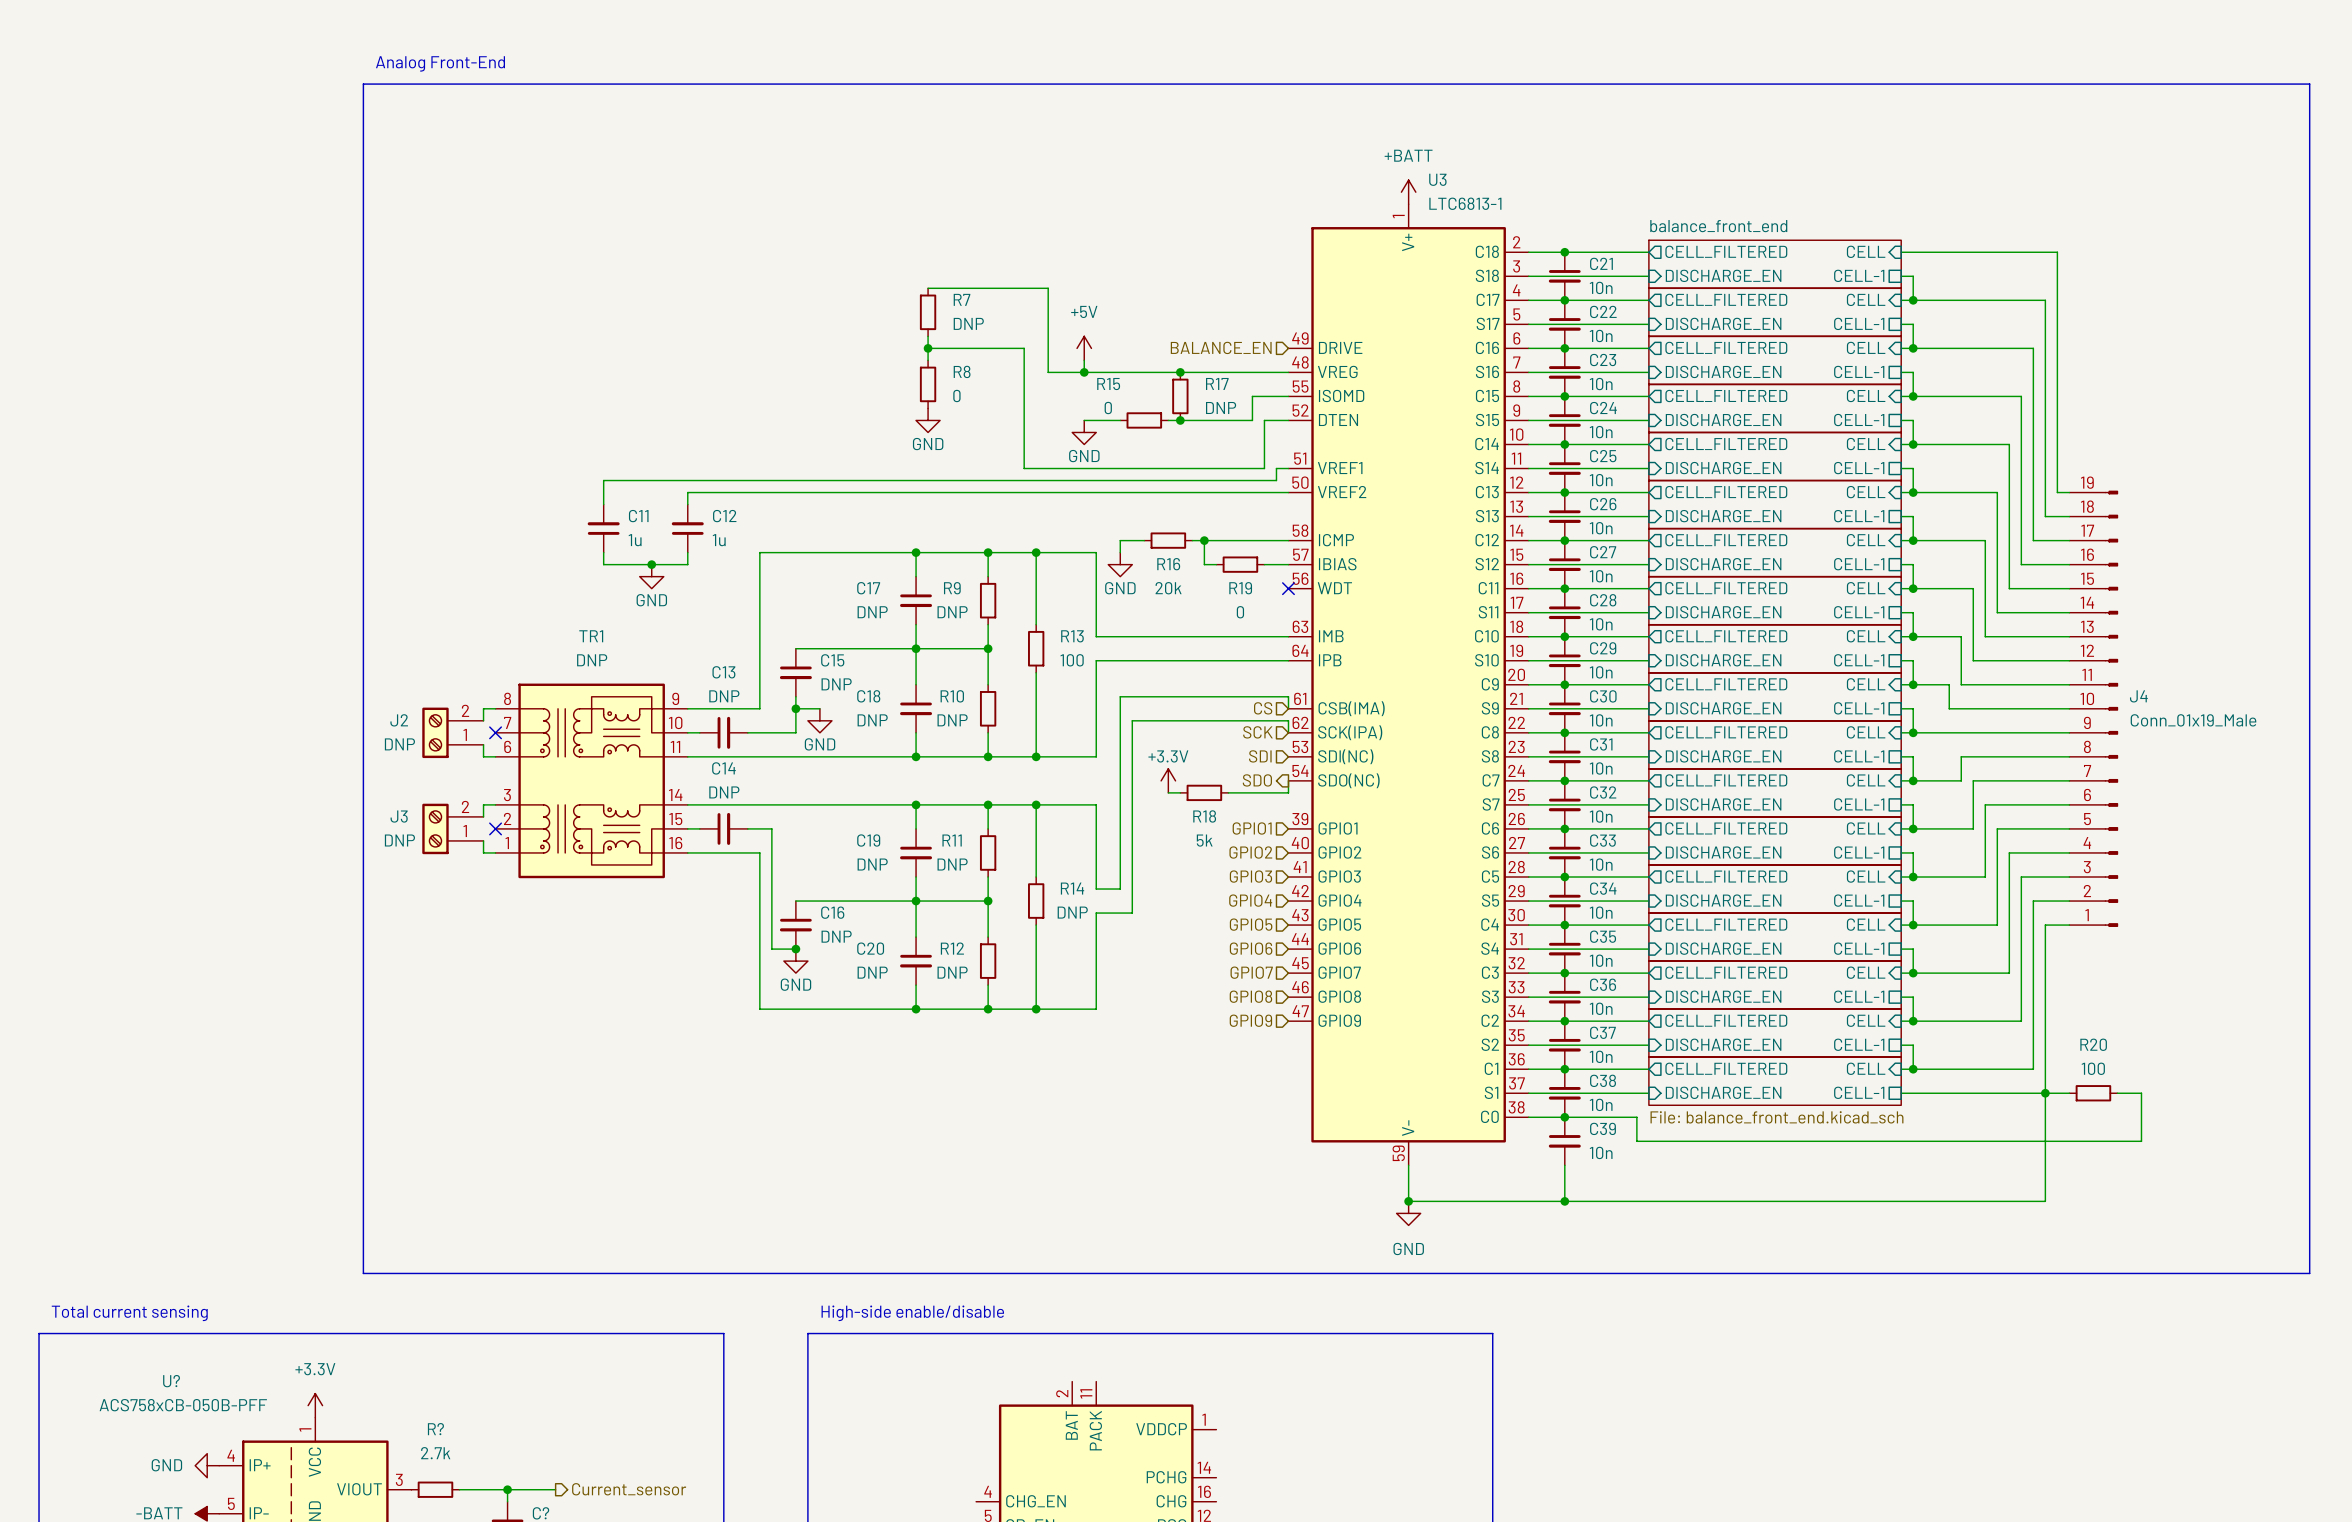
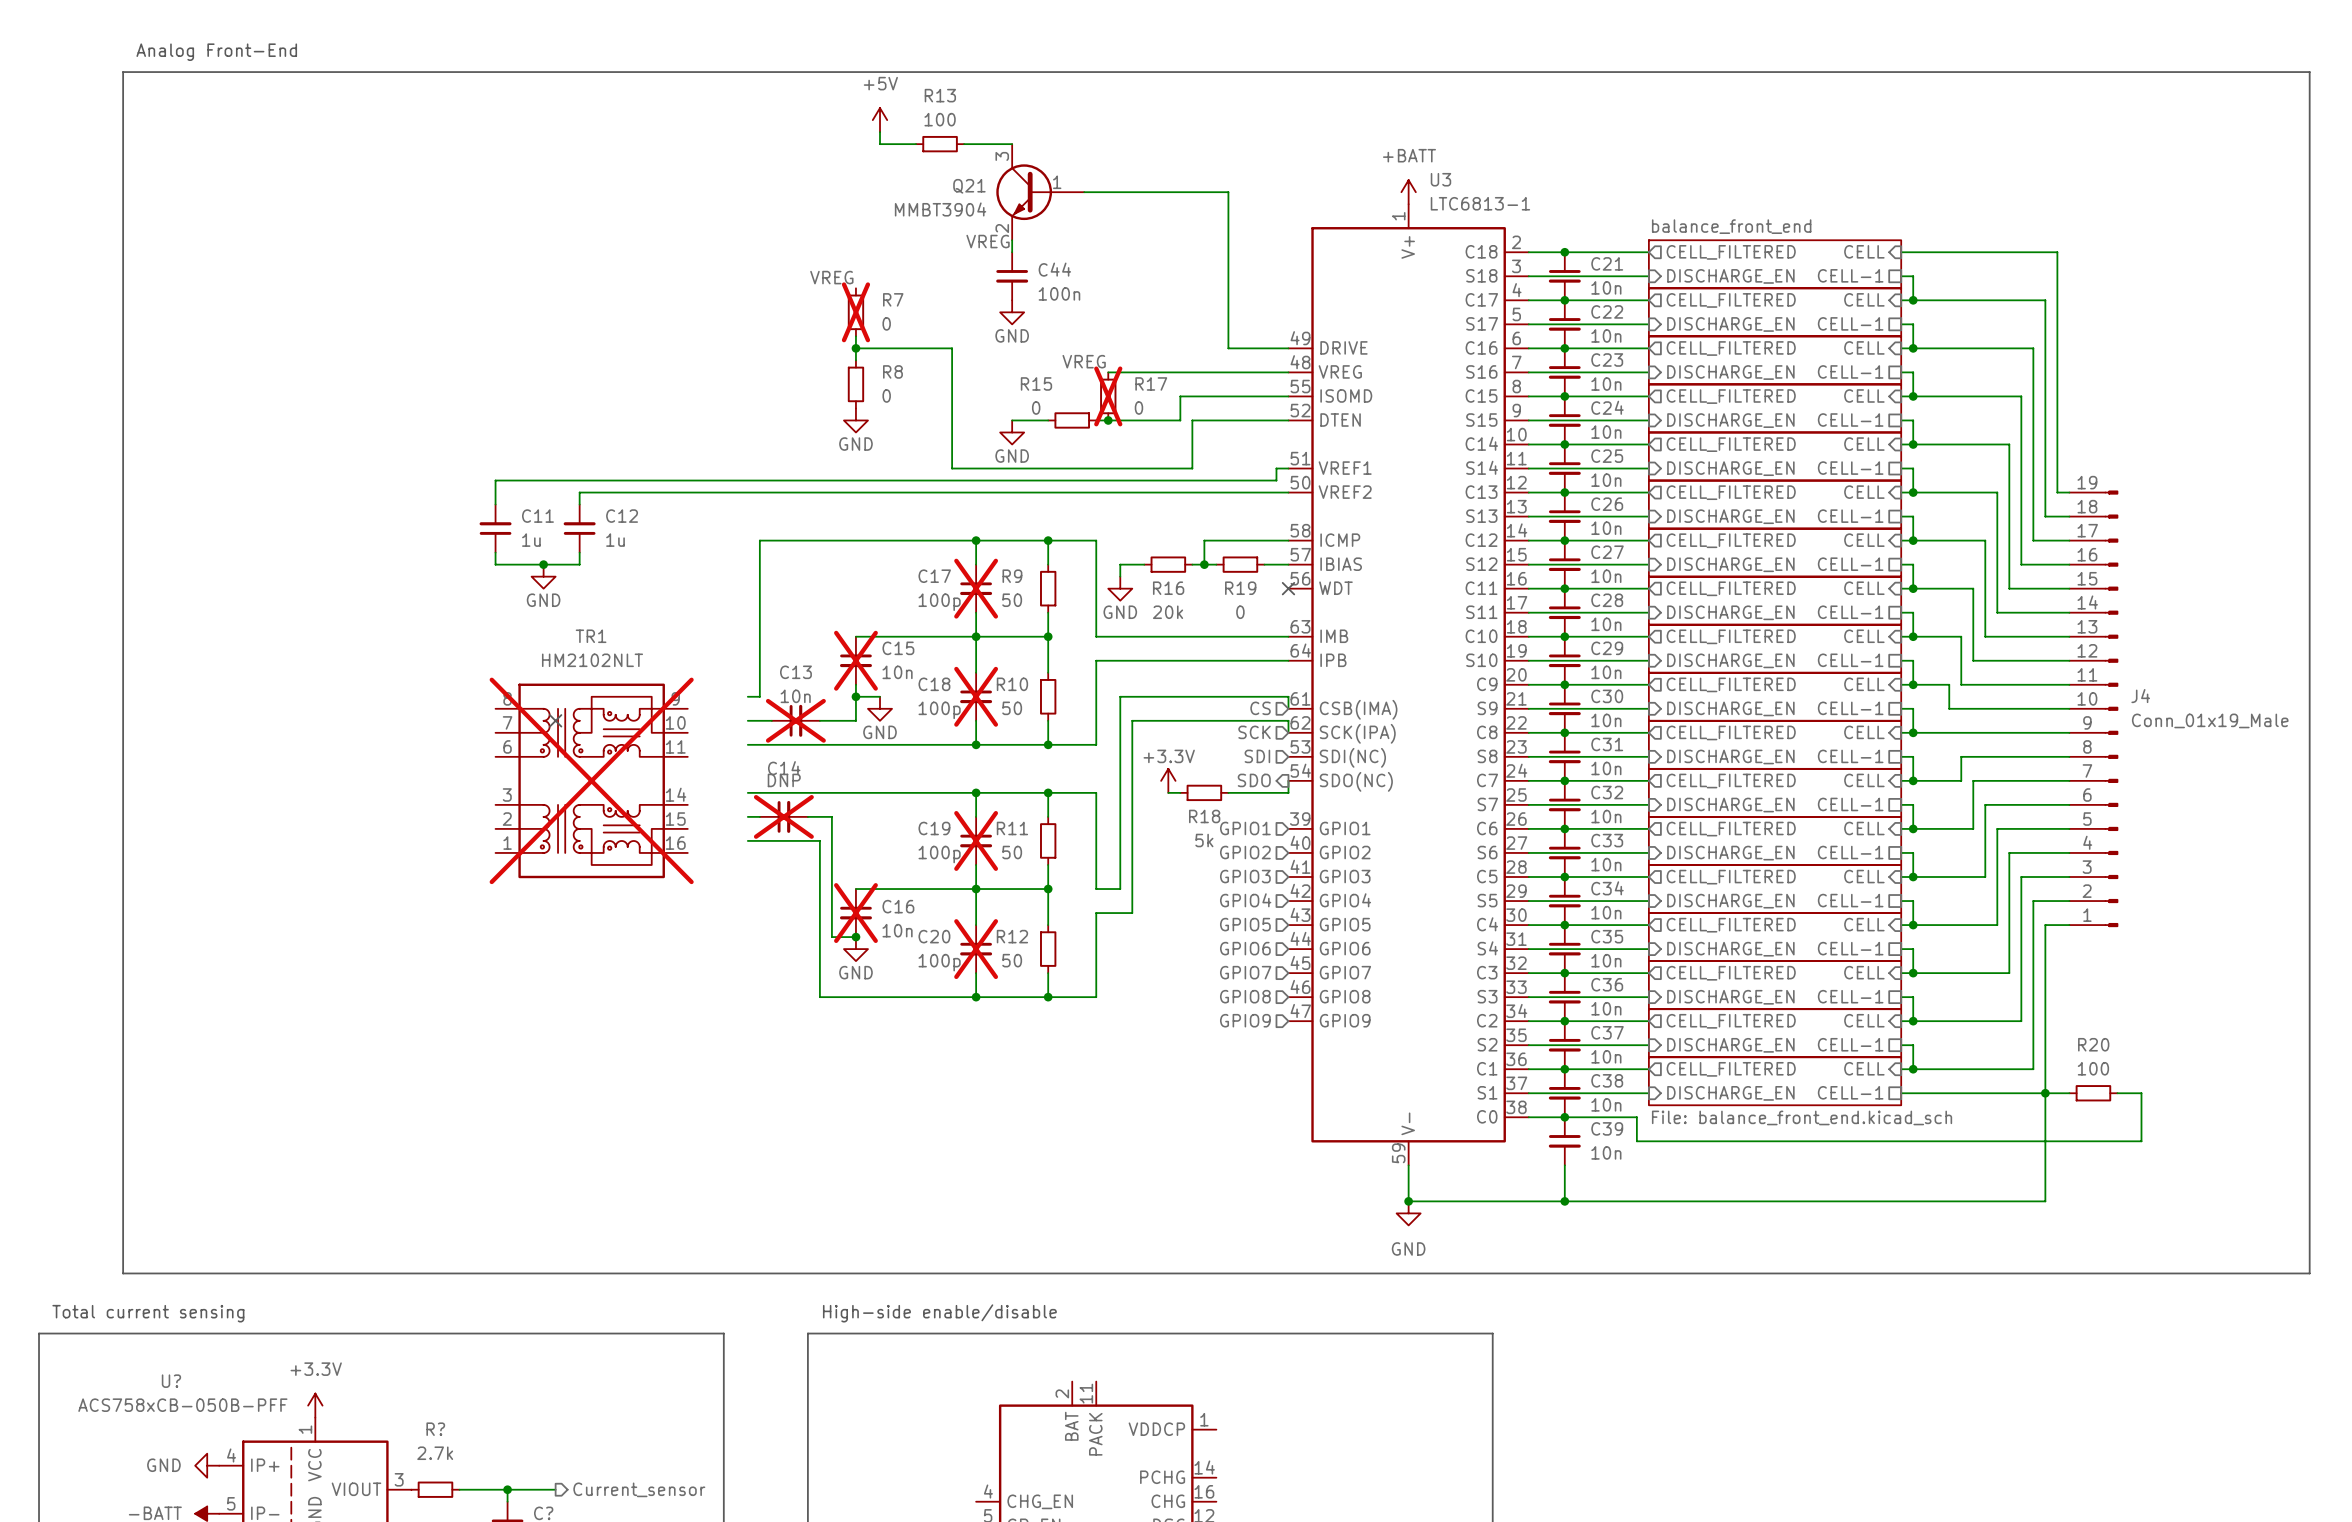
text: none -> Analog Front-End (216, 52)
text: Analog Front-End (440, 63) -> none
line: (2309, 84) (363, 84) (363, 1273) -> (2309, 84) (2309, 72) (123, 72) (123, 1273) (363, 1273)
power symbol: none -> +5V (880, 120)
wire: none -> (880, 132) (880, 144) (916, 144)
wire: none -> (964, 144) (1012, 144)
Q21: none -> MMBT3904 (1040, 192)
wire: none -> (1084, 192) (1228, 192) (1228, 348) (1288, 348)
label: none -> VREG (988, 241)
C44: none -> 100n (1012, 276)
label: none -> VREG (831, 277)
wire: (928, 288) (1048, 288) (1048, 372) (1108, 372) -> none
R7 do-not-place cross: none -> (855, 312)
R7 position: (928, 312) -> (855, 312)
power symbol: none -> GND (1012, 312)
R7 value: DNP (968, 323) -> 0 (886, 323)
wire: (928, 336) (928, 360) -> (855, 336) (855, 360)
hierarchical label: BALANCE_EN (1221, 347) -> none
wire: none -> (855, 348) (928, 348)
junction: none -> (855, 348)
junction: (928, 348) -> none
wire: (952, 348) (1024, 348) (1024, 468) -> (952, 348) (952, 468) (1024, 468)
power symbol: +5V (1084, 348) -> none
wire: (1084, 360) (1084, 372) -> (1012, 240) (1012, 252)
label: none -> VREG (1084, 361)
junction: (1084, 372) -> none
junction: (1180, 372) -> none
R8 position: (928, 384) -> (855, 384)
R17 do-not-place cross: none -> (1108, 396)
R17 position: (1180, 396) -> (1108, 396)
wire: (1252, 396) (1252, 420) -> (1264, 420) (1252, 420)
wire: none -> (1252, 396) (1180, 396) (1180, 420)
R17 value: DNP (1221, 407) -> 0 (1138, 407)
power symbol: none -> GND (855, 420)
power symbol: GND (928, 420) -> none
wire: none -> (1012, 420) (1048, 420)
junction: none -> (1108, 420)
wire: none -> (1120, 420) (1168, 420)
R15 position: (1144, 420) -> (1072, 420)
wire: (1180, 420) (1192, 420) -> (1192, 468) (1192, 420)
junction: (1180, 420) -> none
wire: (1264, 420) (1264, 468) (1192, 468) -> none
power symbol: none -> GND (1012, 432)
power symbol: GND (1084, 432) -> none
wire: (603, 480) (603, 504) -> (603, 480) (495, 480) (495, 504)
wire: (687, 492) (687, 504) -> (687, 492) (579, 492) (579, 504)
C11 position: (603, 528) -> (495, 528)
C12 position: (687, 528) -> (579, 528)
wire: (1144, 540) (1120, 540) (1120, 552) -> (1144, 564) (1120, 564) (1120, 576)
R16 position: (1168, 540) -> (1168, 564)
wire: (1192, 540) (1204, 540) -> (1192, 564) (1204, 564)
junction position: (1204, 540) -> (1204, 564)
wire: (603, 552) (603, 564) (687, 564) (687, 552) -> (495, 552) (495, 564) (579, 564) (579, 552)
wire: (759, 552) (1096, 552) -> (759, 552) (759, 540) (1096, 540) (1096, 552)
wire: (916, 552) (916, 576) -> (976, 540) (976, 564)
junction: (916, 552) -> none
wire: (988, 552) (988, 576) -> (1048, 540) (1048, 564)
junction position: (988, 552) -> (976, 540)
wire: (1036, 552) (1036, 624) -> none
junction position: (1036, 552) -> (1048, 540)
junction: none -> (543, 564)
junction: (651, 564) -> none
power symbol position: GND (1120, 564) -> GND (1120, 588)
power symbol position: GND (651, 576) -> GND (543, 576)
C17 do-not-place cross: none -> (976, 588)
C17 position: (916, 600) -> (976, 588)
R9 position: (988, 600) -> (1048, 588)
C17 value: DNP (872, 612) -> 100p (939, 602)
R9 value: DNP (952, 612) -> 50 (1012, 600)
wire: (916, 624) (916, 684) -> (976, 612) (976, 672)
wire: (988, 624) (988, 684) -> (1048, 612) (1048, 672)
junction: none -> (1048, 636)
R13 name position: R13 (1072, 636) -> R13 (940, 95)
wire: (795, 648) (988, 648) -> (855, 636) (1048, 636)
junction: (916, 648) -> none
junction position: (988, 648) -> (976, 636)
R13 rotation: 0° (1036, 648) -> 90° clockwise (940, 144)
R13 position: (1036, 648) -> (940, 144)
TR1 value: DNP (592, 660) -> HM2102NLT (592, 660)
C15 do-not-place cross: none -> (855, 660)
R13 value position: 100 (1072, 660) -> 100 (940, 119)
C13 name position: C13 (723, 672) -> C13 (795, 672)
C15 position: (795, 672) -> (855, 660)
wire: (1036, 672) (1036, 756) -> none
C15 value: DNP (836, 684) -> 10n (897, 672)
wire: none -> (855, 684) (855, 720) (819, 720)
C13 value: DNP (724, 696) -> 10n (795, 696)
wire: (759, 696) (759, 708) (687, 708) -> (759, 696) (747, 696)
wire: (795, 696) (795, 732) (747, 732) -> none
junction: none -> (855, 696)
C18 do-not-place cross: none -> (976, 696)
wire: (495, 708) (483, 708) (483, 720) -> none
wire: (795, 708) (819, 708) -> (855, 696) (880, 696)
junction: (795, 708) -> none
C18 position: (916, 708) -> (976, 696)
R10 position: (988, 708) -> (1048, 696)
no-connect mark: none -> (555, 720)
wire: none -> (747, 720) (771, 720)
C13 do-not-place cross: none -> (795, 720)
power symbol position: GND (819, 720) -> GND (880, 708)
C18 value: DNP (872, 720) -> 100p (939, 710)
R10 value: DNP (952, 720) -> 50 (1012, 708)
J2: DNP (452, 732) -> none
no-connect mark: (495, 732) -> none
wire: (687, 732) (699, 732) -> none
C13 position: (723, 732) -> (795, 720)
wire: (916, 732) (916, 756) -> (976, 720) (976, 744)
wire: (988, 732) (988, 756) -> (1048, 720) (1048, 744)
wire: (483, 744) (483, 756) (495, 756) -> none
wire: (1096, 744) (1096, 756) (687, 756) -> (1096, 744) (747, 744)
junction: (916, 756) -> none
junction position: (988, 756) -> (976, 744)
junction position: (1036, 756) -> (1048, 744)
C14 name position: C14 (723, 768) -> C14 (784, 768)
TR1 do-not-place cross: none -> (591, 780)
wire: (495, 804) (483, 804) (483, 816) -> none
wire: (687, 804) (1096, 804) -> (747, 792) (1096, 792) (1096, 804)
wire: (916, 804) (916, 828) -> (976, 792) (976, 816)
junction: (916, 804) -> none
wire: (988, 804) (988, 828) -> (1048, 792) (1048, 816)
junction position: (988, 804) -> (976, 792)
wire: (1036, 804) (1036, 877) -> none
junction position: (1036, 804) -> (1048, 792)
C14 do-not-place cross: none -> (783, 816)
J3: DNP (452, 828) -> none
no-connect mark: (495, 828) -> none
wire: (687, 828) (699, 828) -> (747, 816) (759, 816)
C14 position: (723, 828) -> (783, 816)
wire: (747, 828) (771, 828) (771, 949) (795, 949) -> (807, 816) (831, 816) (831, 937) (855, 937)
wire: (483, 840) (483, 852) (495, 852) -> none
C19 do-not-place cross: none -> (976, 840)
wire: (687, 852) (759, 852) (759, 1009) (1096, 1009) (1096, 997) -> (747, 840) (819, 840) (819, 997) (1096, 997)
C19 position: (916, 852) -> (976, 840)
R11 position: (988, 852) -> (1048, 840)
C19 value: DNP (872, 864) -> 100p (939, 854)
R11 value: DNP (952, 864) -> 50 (1012, 852)
wire: (916, 877) (916, 937) -> (976, 864) (976, 925)
wire: (988, 877) (988, 937) -> (1048, 864) (1048, 925)
junction: none -> (1048, 889)
wire: (795, 901) (988, 901) -> (855, 889) (1048, 889)
junction: (916, 901) -> none
junction position: (988, 901) -> (976, 889)
R14: DNP (1036, 901) -> none
C16 name position: C16 (832, 912) -> C16 (898, 906)
C16 do-not-place cross: none -> (855, 913)
C16 position: (795, 925) -> (855, 913)
wire: (1036, 925) (1036, 1009) -> none
C16 value: DNP (836, 936) -> 10n (897, 930)
junction: none -> (855, 937)
junction: (795, 949) -> none
C20 do-not-place cross: none -> (976, 949)
power symbol position: GND (795, 961) -> GND (855, 949)
C20 position: (916, 961) -> (976, 949)
R12 position: (988, 961) -> (1048, 949)
C20 value: DNP (872, 972) -> 100p (939, 962)
R12 value: DNP (952, 972) -> 50 (1012, 960)
wire: (916, 985) (916, 1009) -> (976, 973) (976, 997)
wire: (988, 985) (988, 1009) -> (1048, 973) (1048, 997)
junction: (916, 1009) -> none
junction position: (988, 1009) -> (976, 997)
junction position: (1036, 1009) -> (1048, 997)

